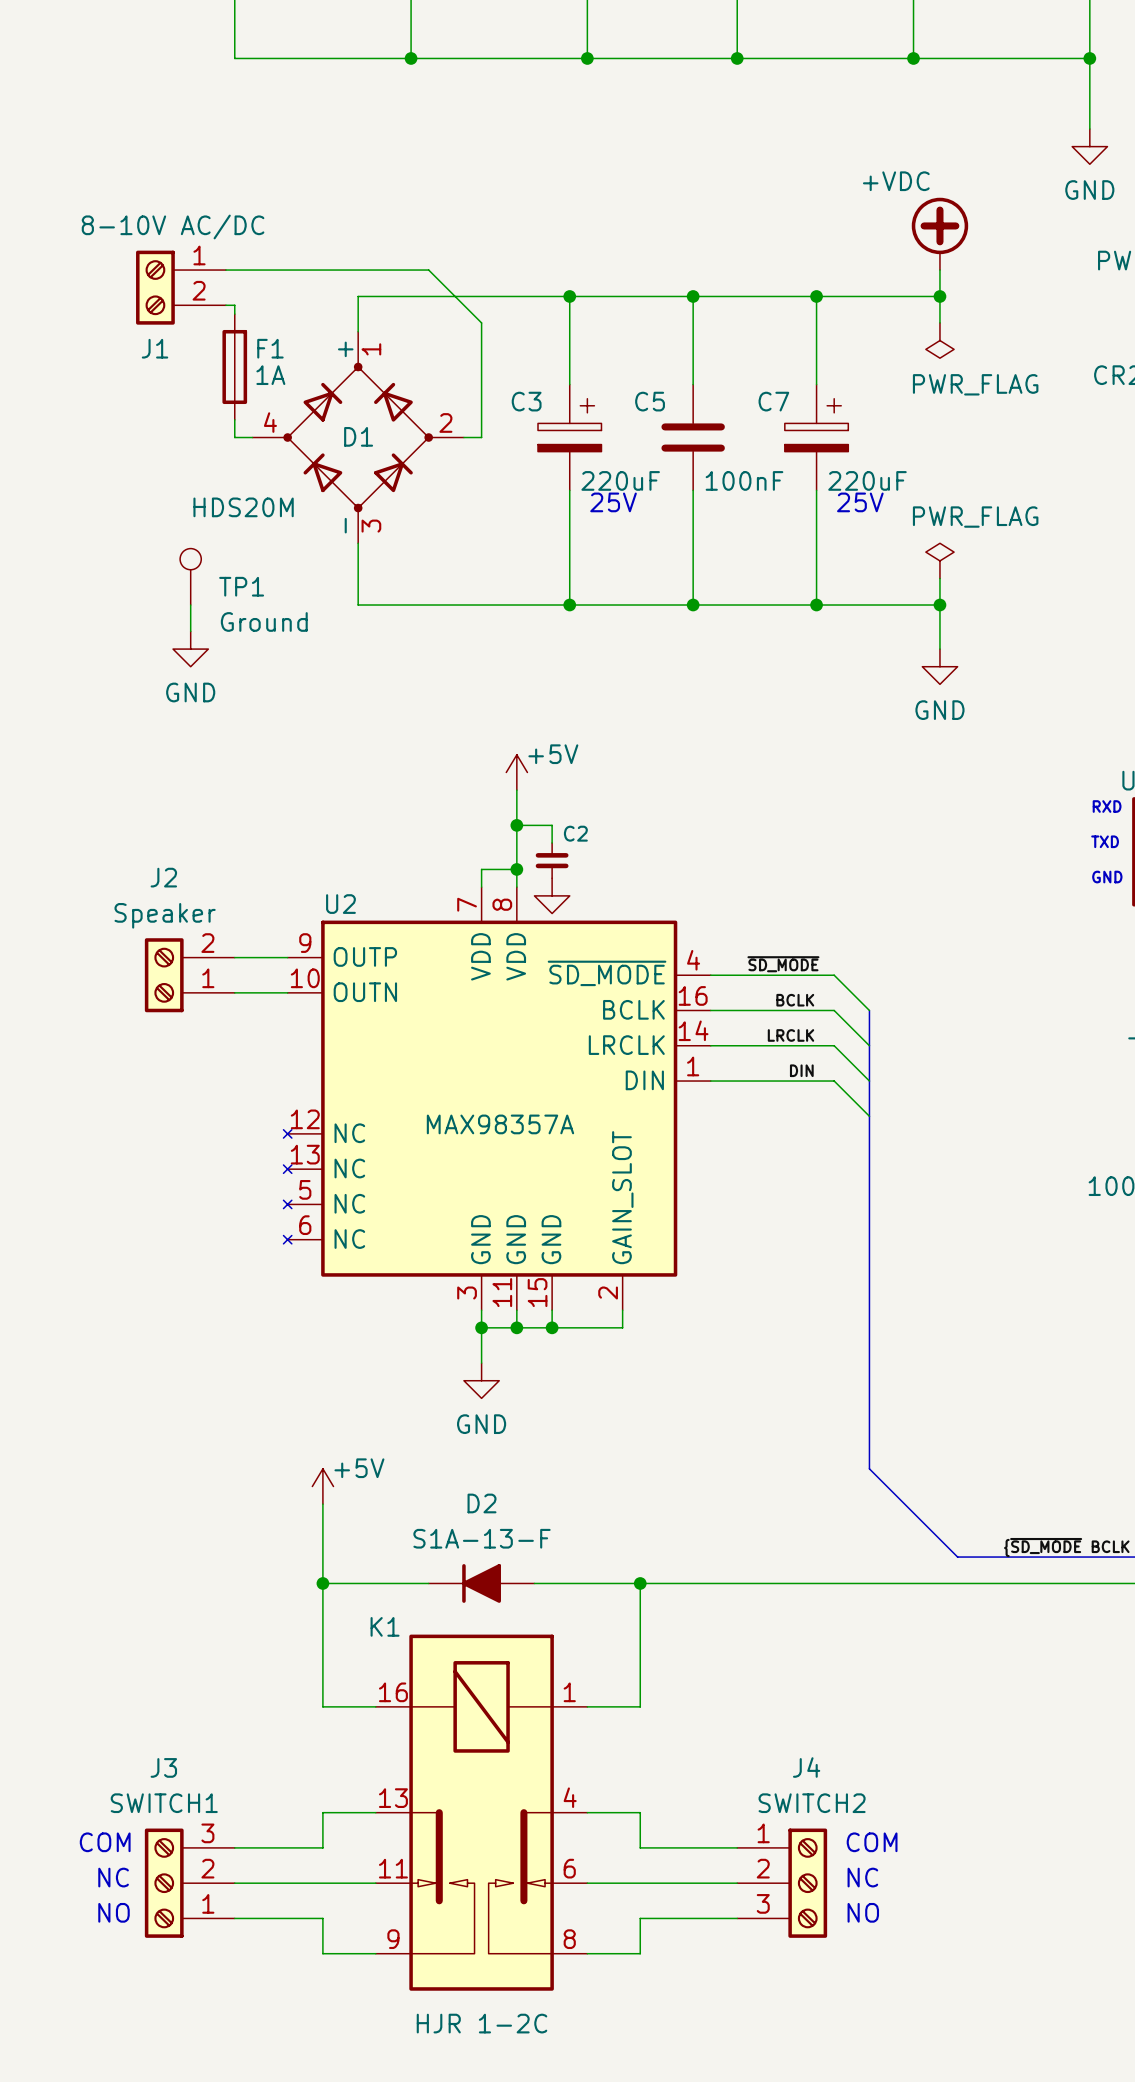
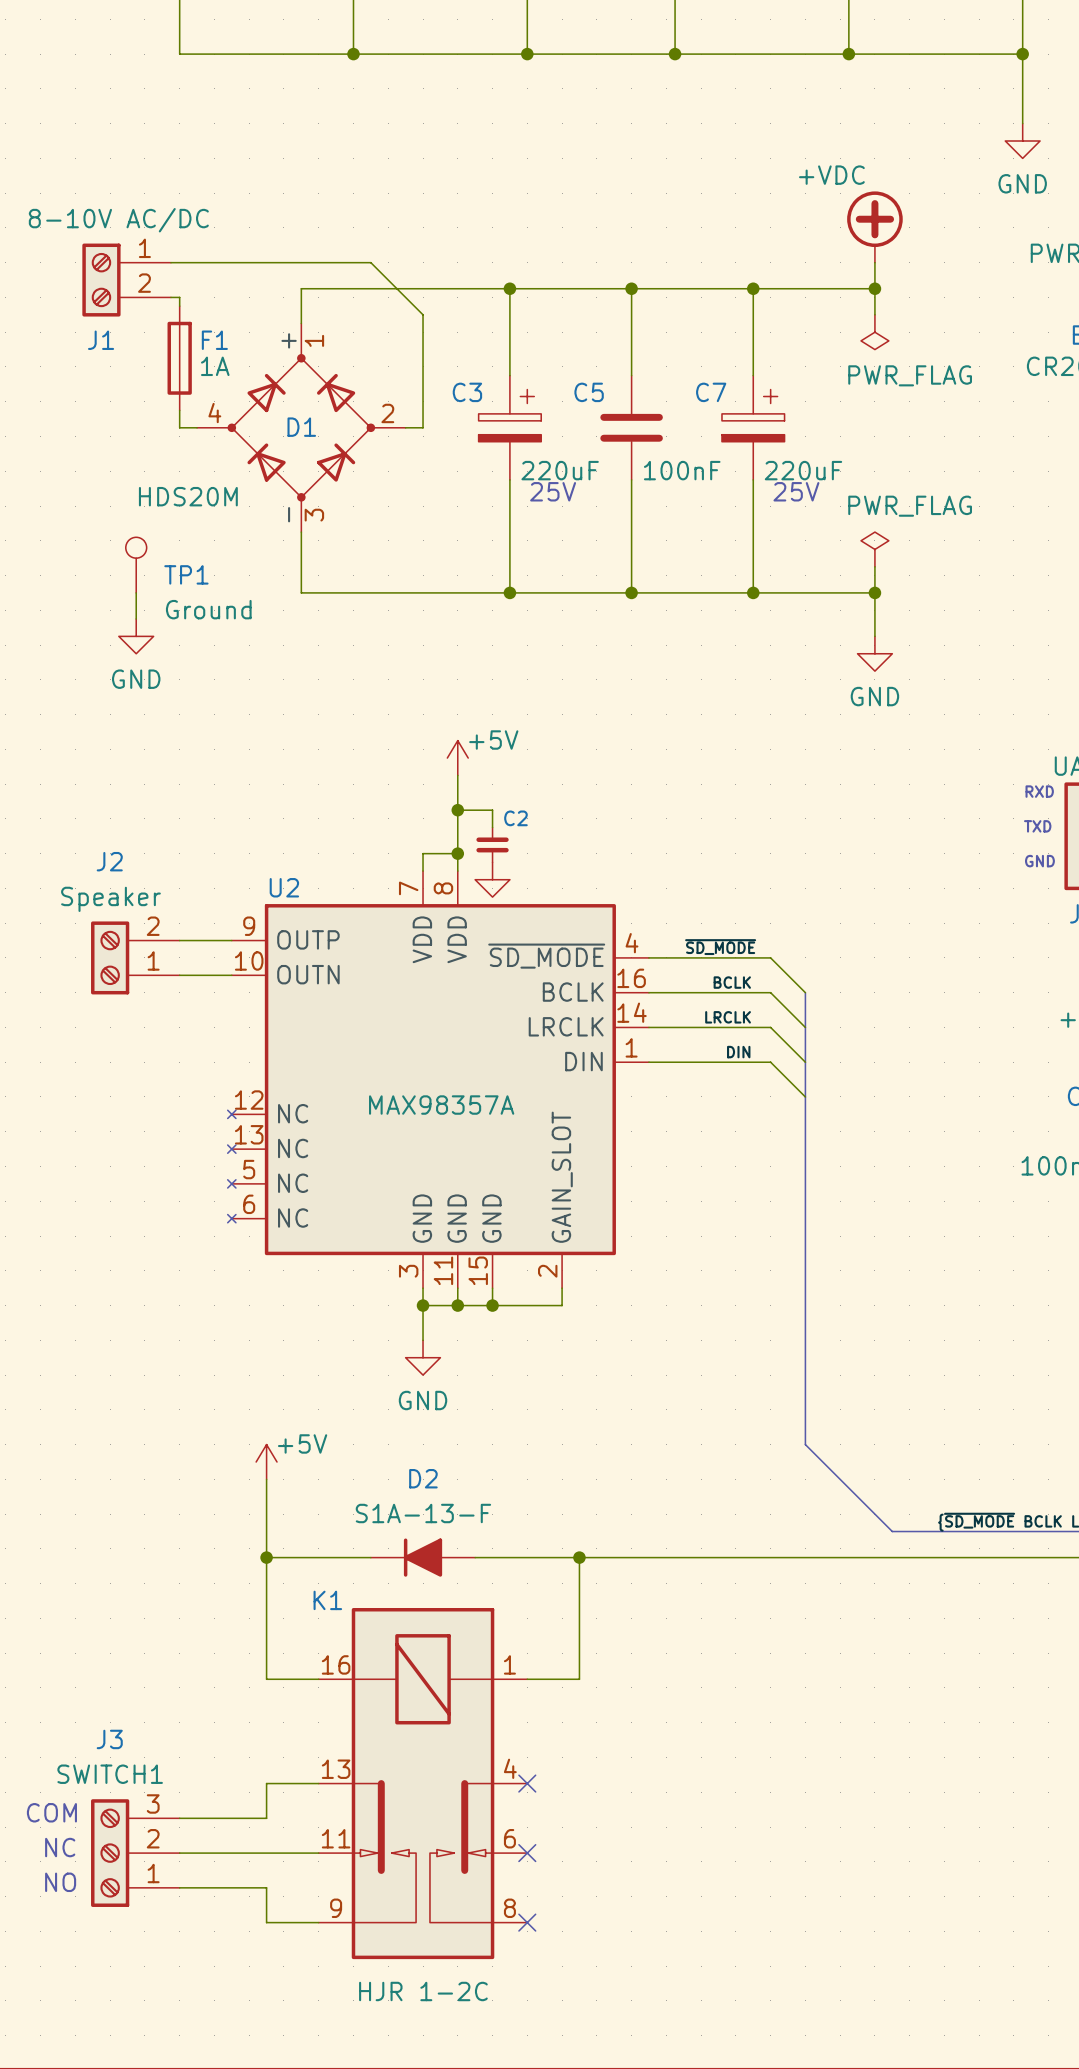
wire: (587, 1812) (640, 1812) (640, 1847) (737, 1847) -> none
no-connect mark: none -> (527, 1783)
text: COM (872, 1842) -> none
text: NC (862, 1877) -> none
wire: (587, 1883) (737, 1883) -> none
no-connect mark: none -> (527, 1853)
J4: SWITCH2 (782, 1883) -> none
text: NO (863, 1912) -> none
wire: (737, 1918) (640, 1918) (640, 1953) (587, 1953) -> none
no-connect mark: none -> (527, 1922)

